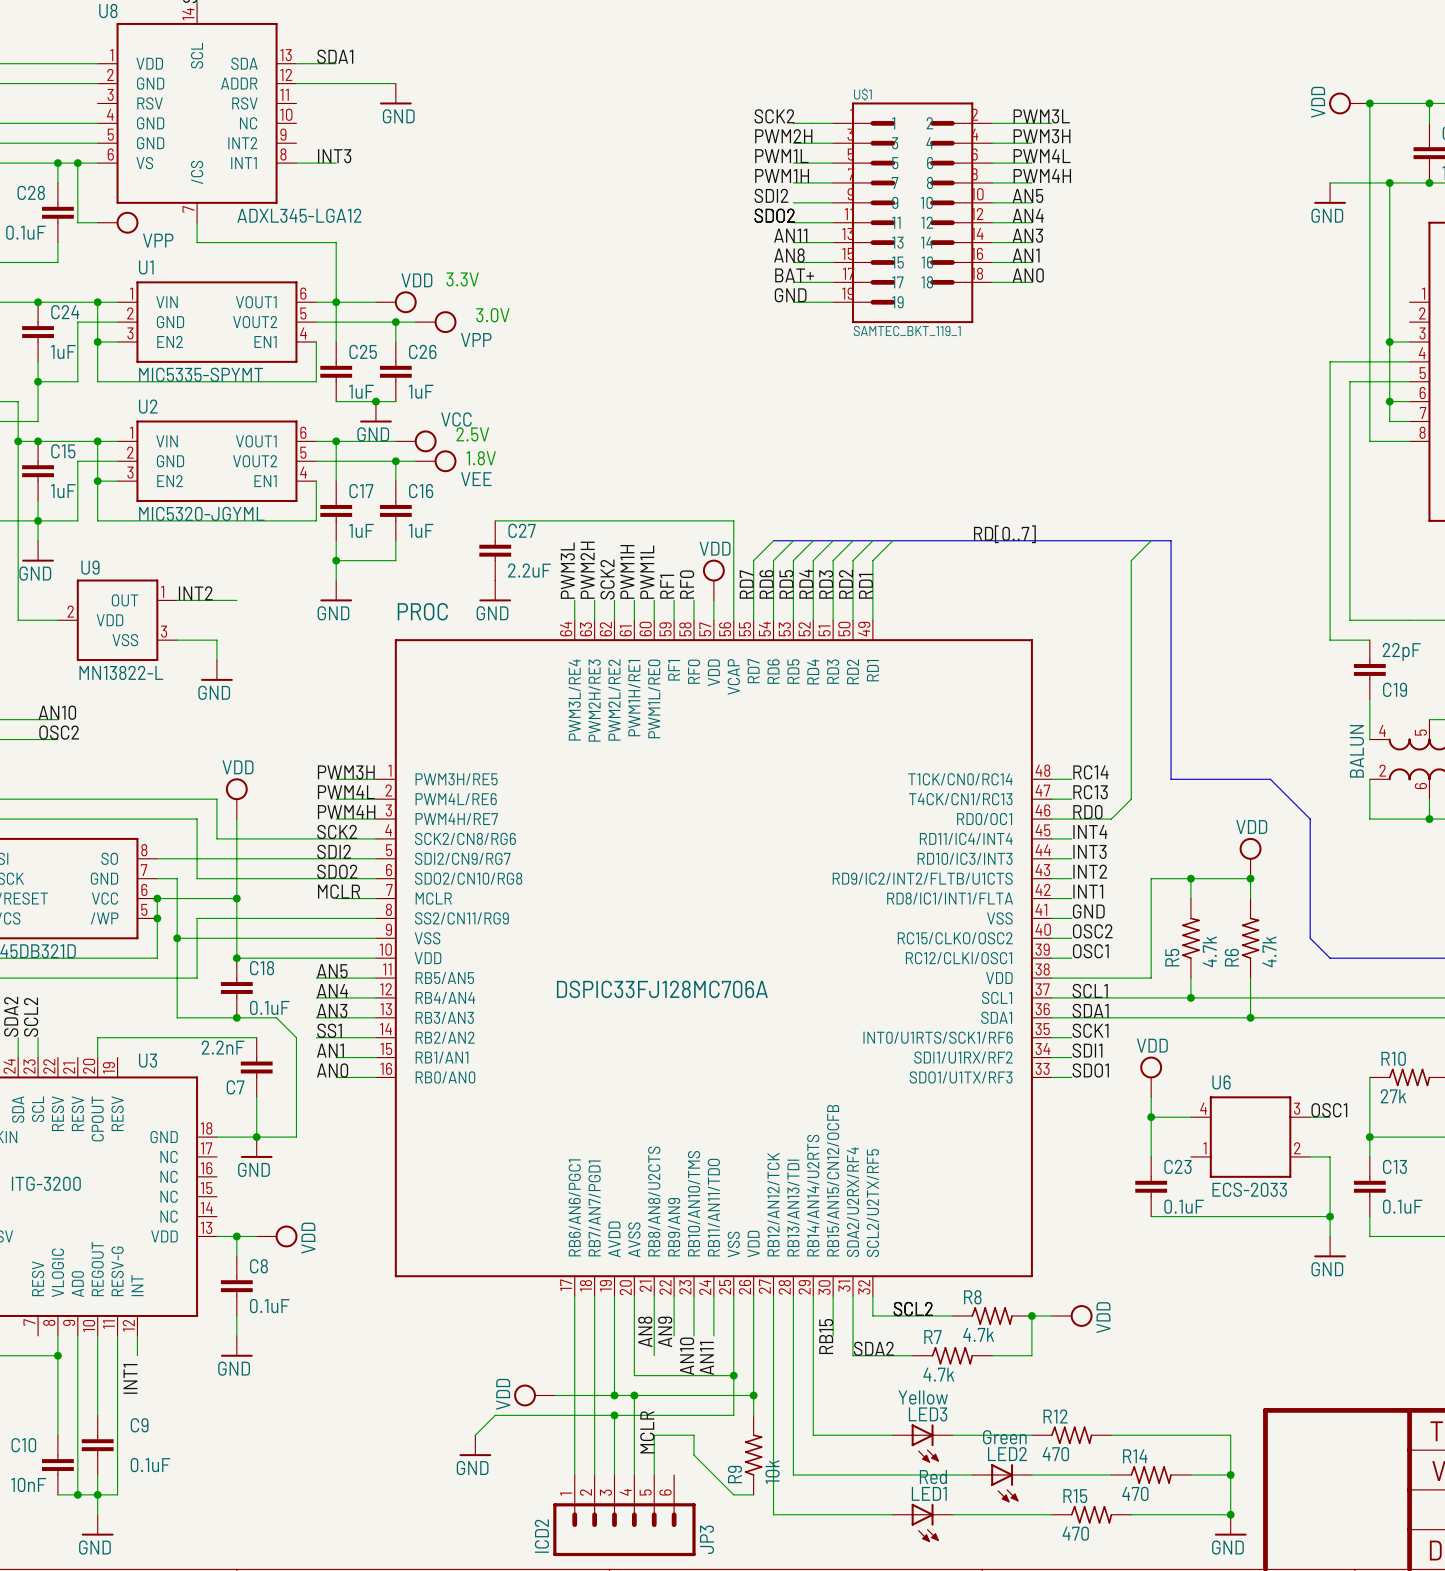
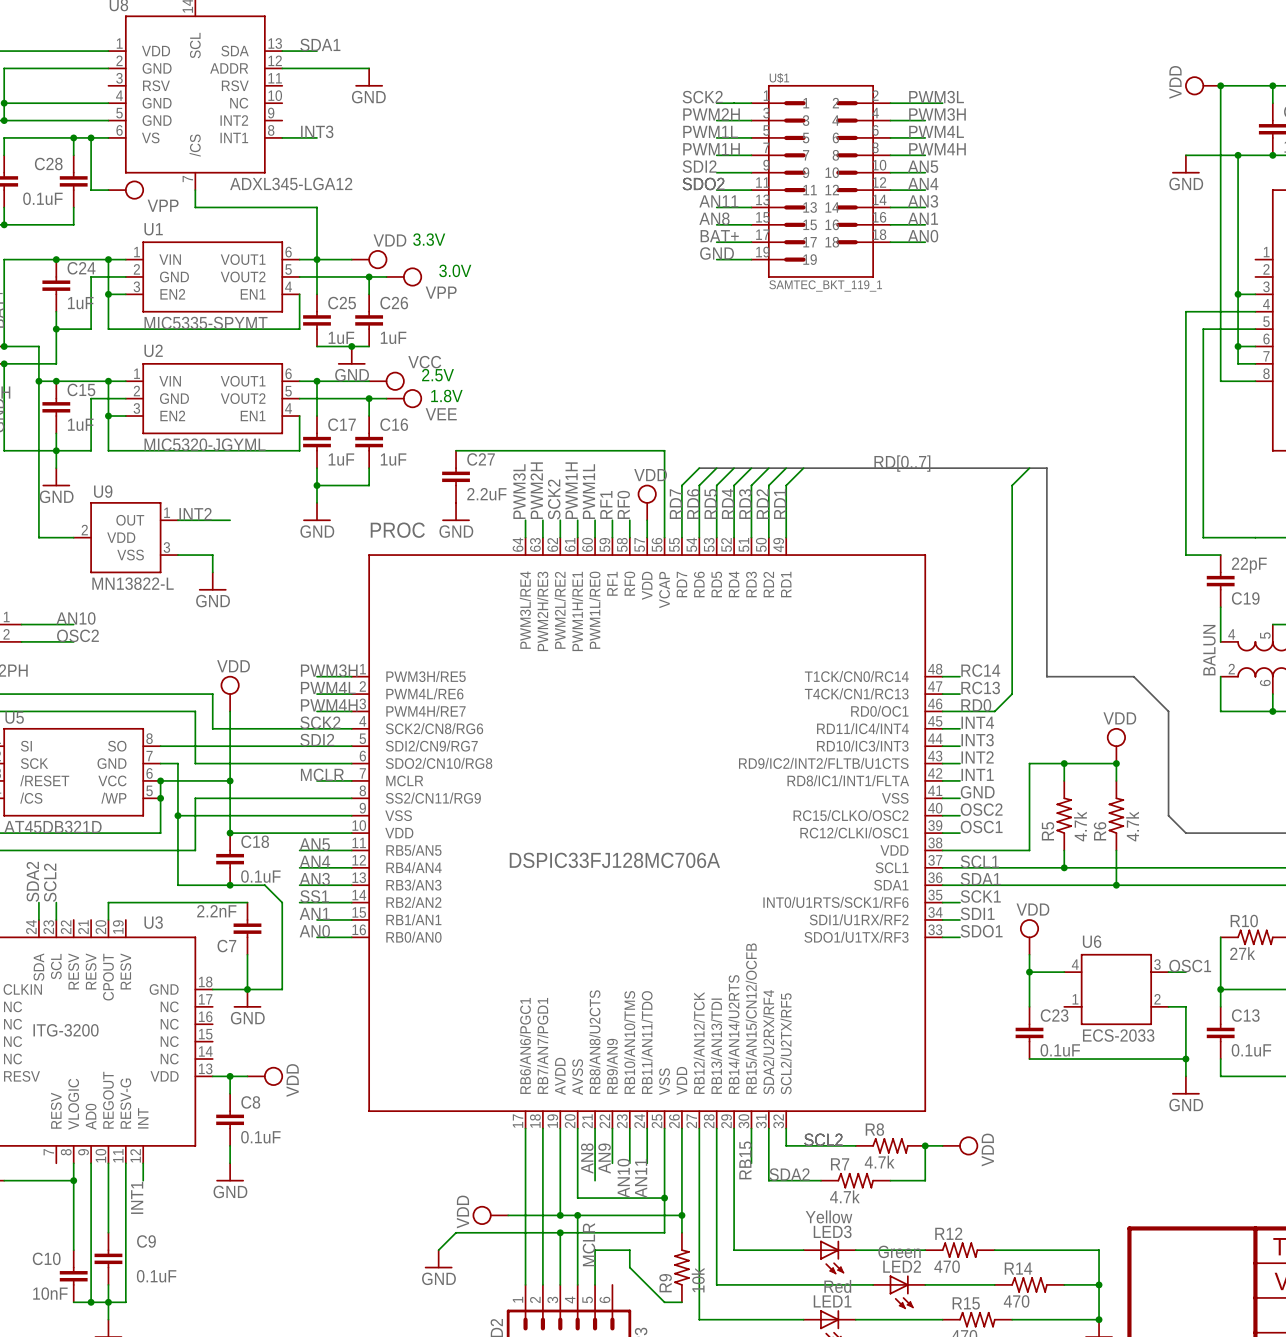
label: SDO2 (337, 871) -> none

